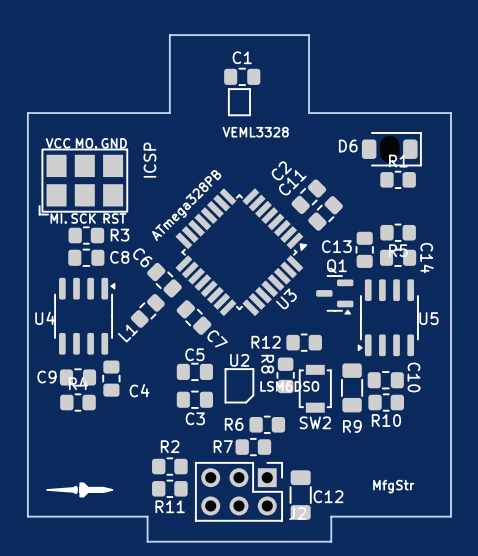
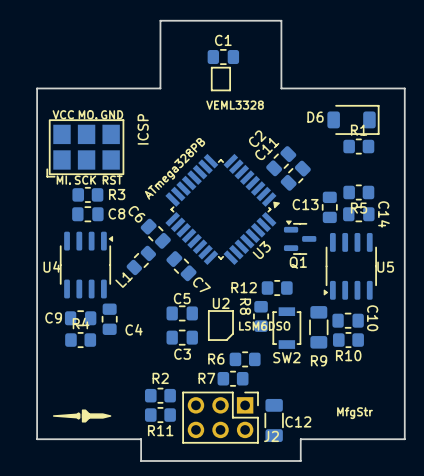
Q1 rotation: 0° (334, 294) -> 180° (300, 237)

